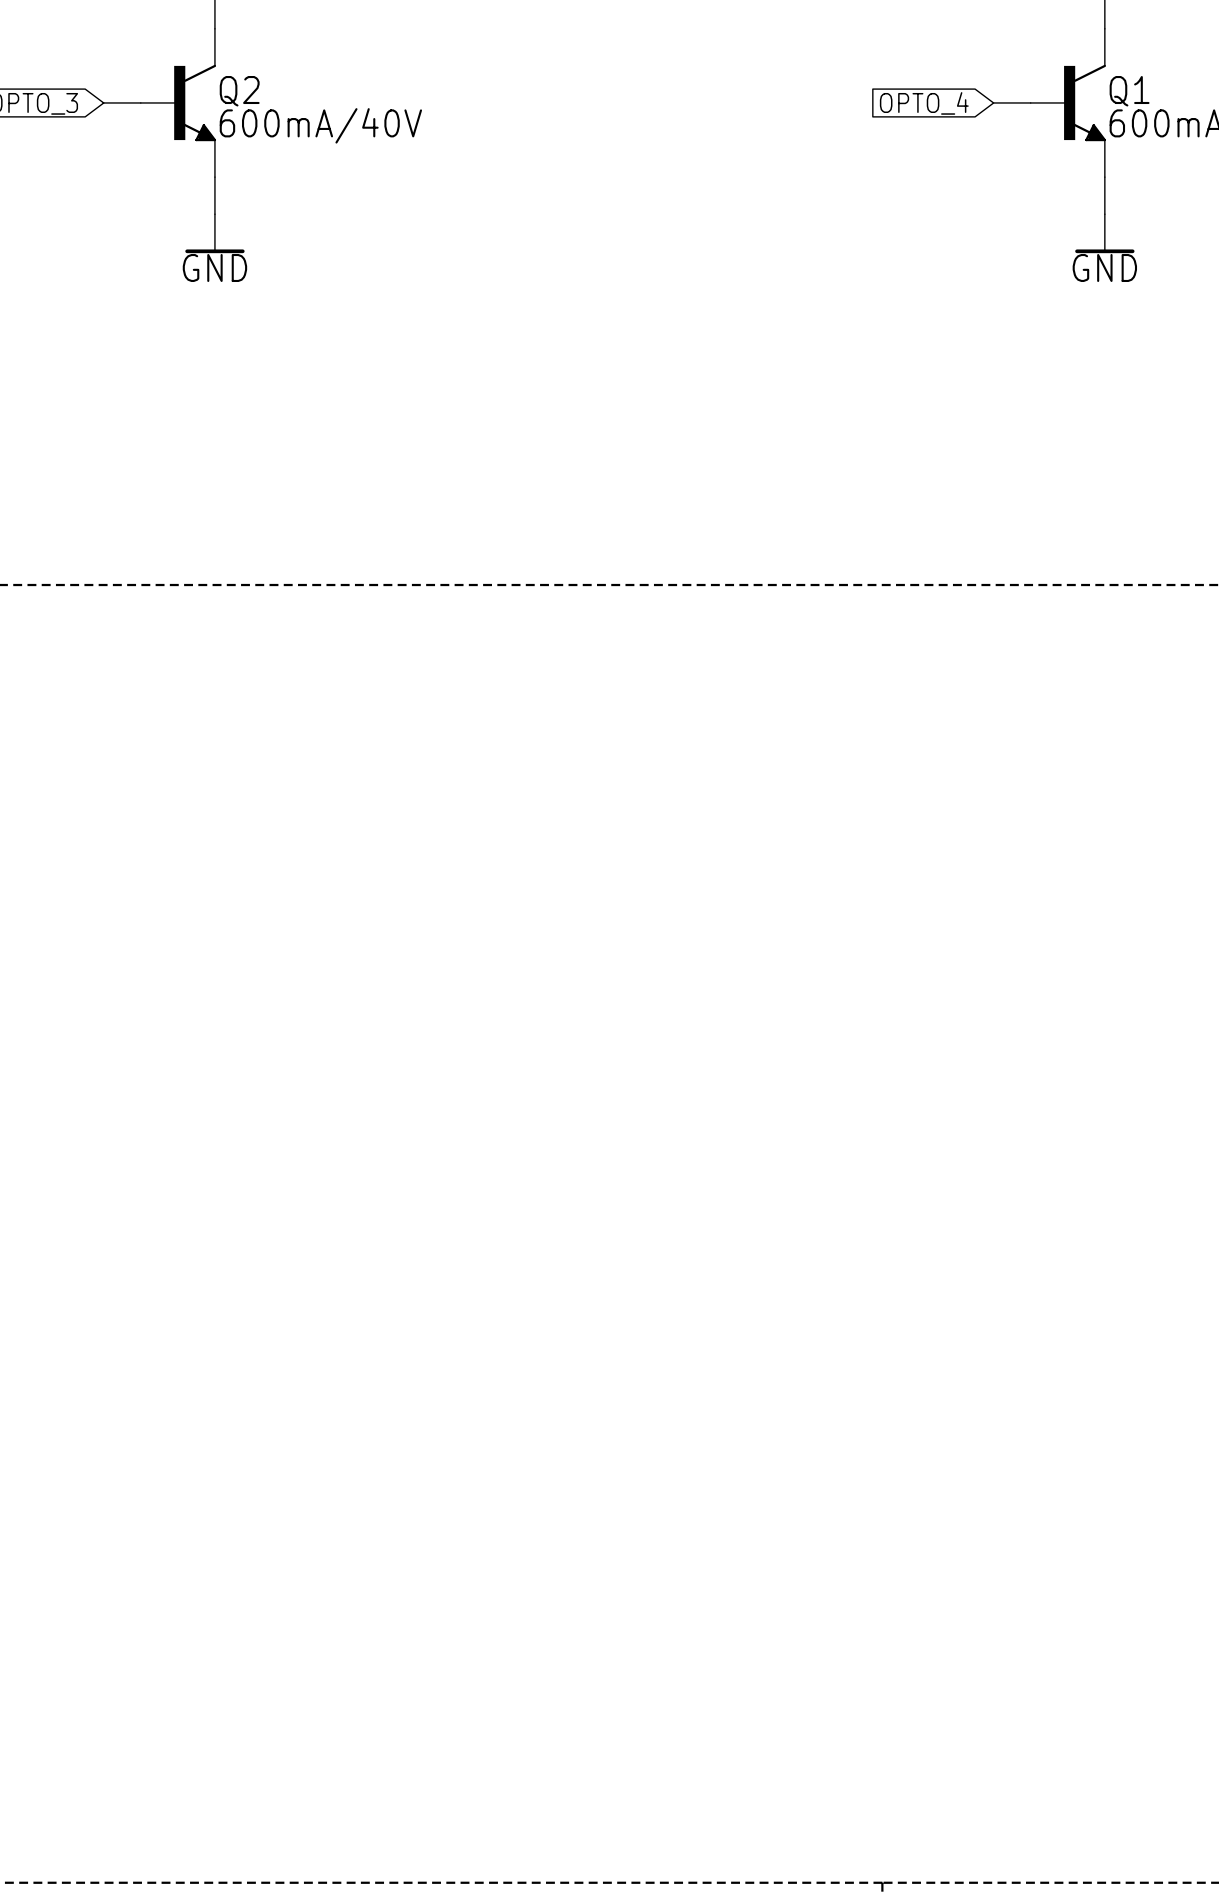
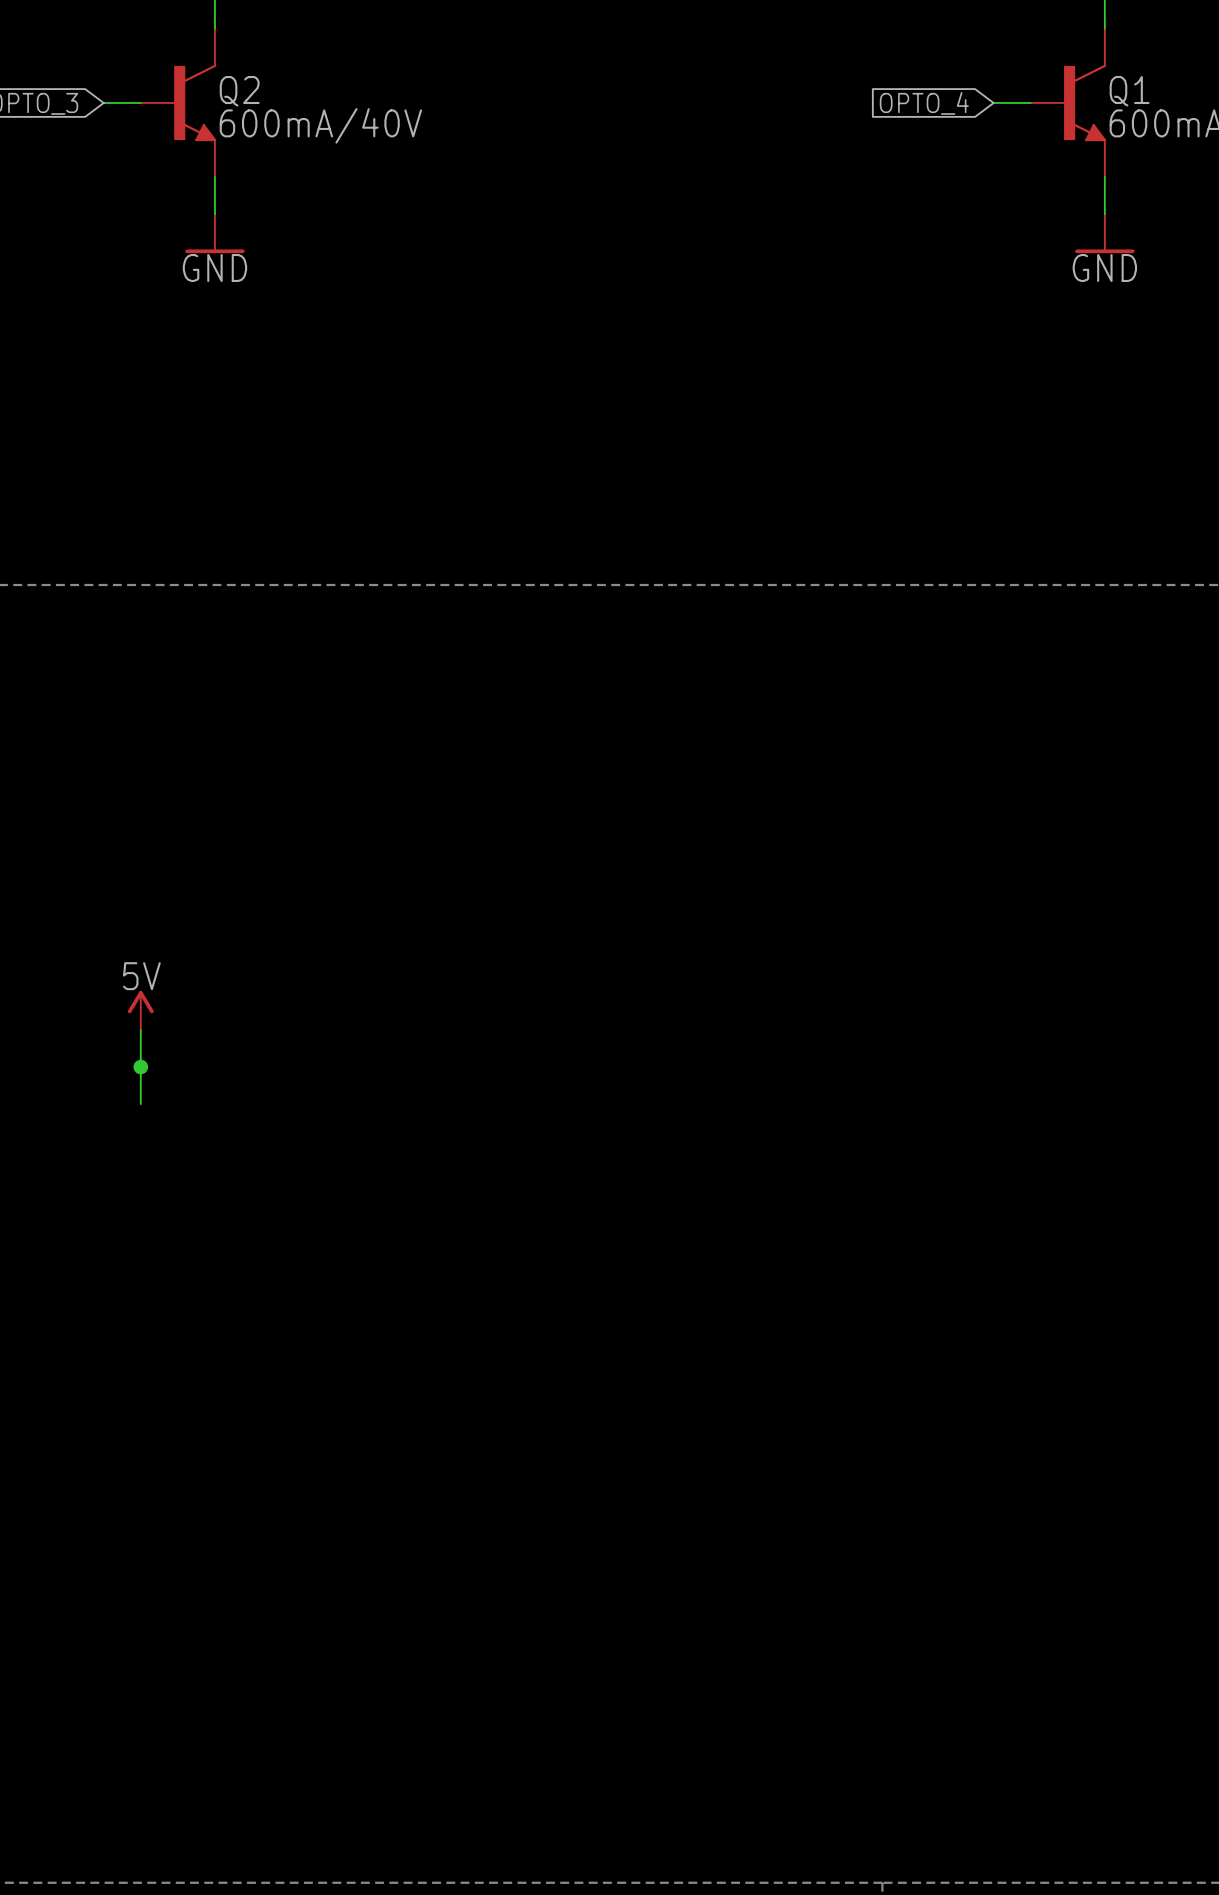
power symbol: none -> 5V (140, 1010)
wire: none -> (140, 1029) (140, 1104)
junction: none -> (140, 1067)

